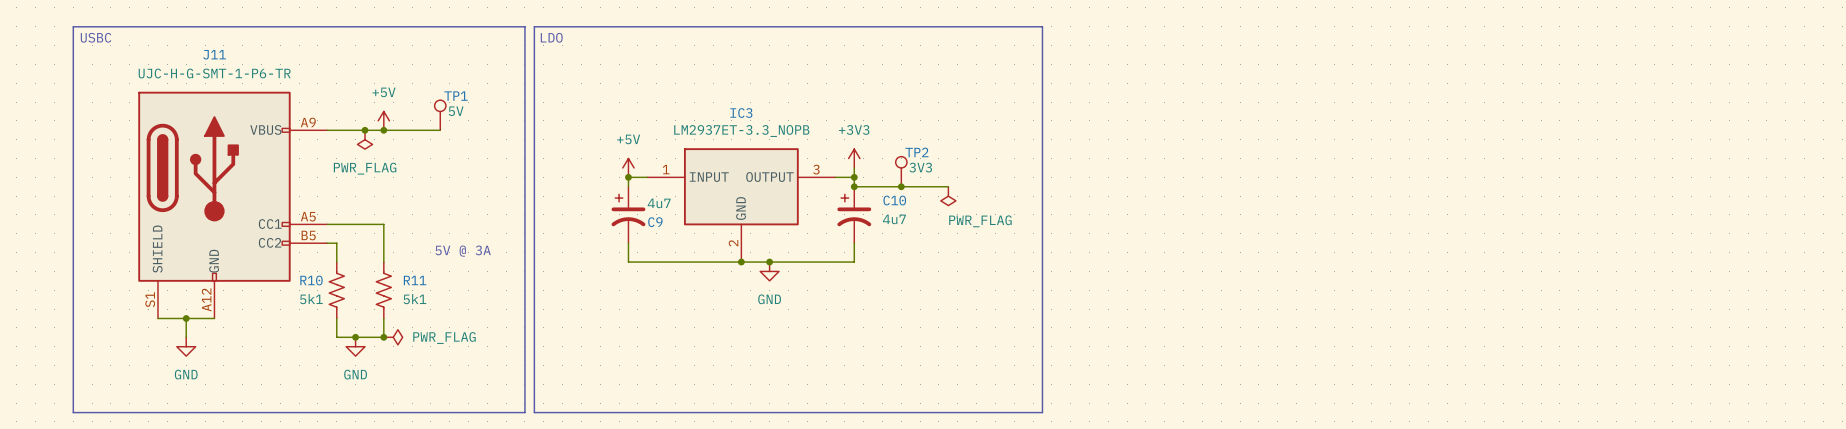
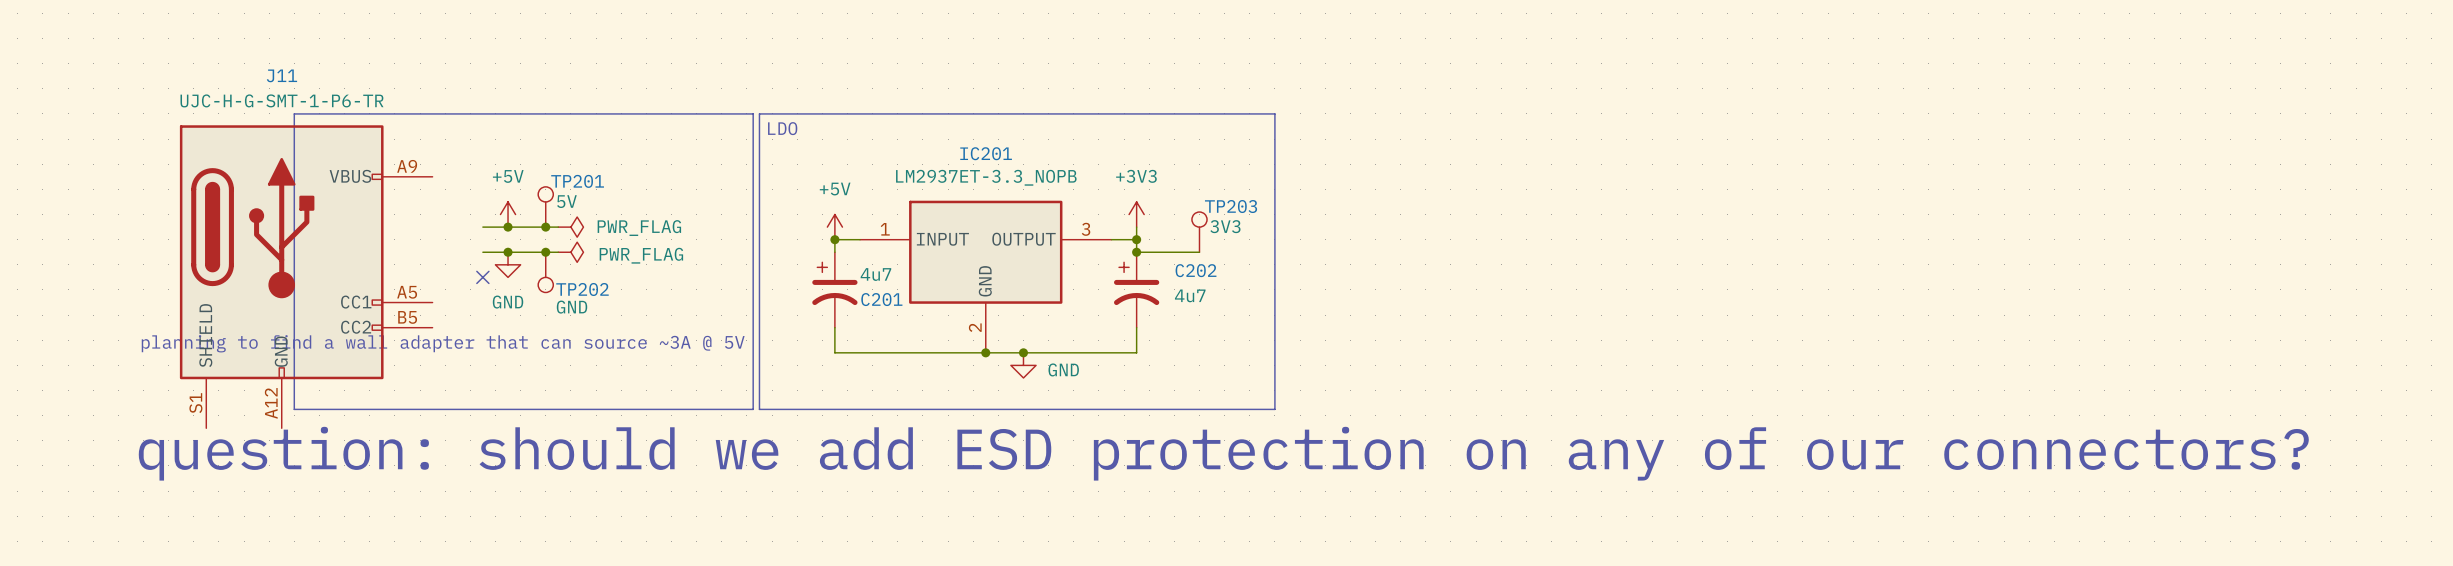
line: (73, 26) (524, 26) (524, 412) (73, 412) (73, 26) -> none
line: (534, 26) (1042, 26) (1042, 412) (534, 412) (534, 26) -> none
text: USBC (96, 37) -> none
text position: LDO (551, 37) -> LDO (782, 128)
line: none -> (294, 113) (753, 113) (753, 409) (294, 409) (294, 113)
line: none -> (759, 113) (1274, 113) (1274, 409) (759, 409) (759, 113)
IC3 name: IC3 (741, 113) -> IC201 (986, 153)
TP1: 5V (440, 115) -> none
power symbol position: +5V (383, 120) -> +5V (508, 214)
wire: (327, 130) (440, 130) -> none
junction: (365, 130) -> none
junction: (383, 130) -> none
power symbol: PWR_FLAG (365, 139) -> none
TP201: none -> 5V (545, 206)
TP2 name: TP2 (916, 152) -> TP203 (1231, 206)
wire: none -> (482, 227) (558, 227)
junction: none -> (508, 227)
junction: none -> (545, 227)
power symbol: none -> PWR_FLAG (570, 227)
wire: none -> (482, 252) (558, 252)
junction: none -> (508, 252)
junction: none -> (545, 252)
power symbol: none -> PWR_FLAG (570, 252)
wire: (901, 186) (948, 186) -> none
junction: (901, 186) -> none
power symbol: none -> GND (508, 264)
power symbol: PWR_FLAG (948, 196) -> none
C10 name: C10 (894, 200) -> C202 (1196, 270)
TP202: none -> GND (545, 272)
no-connect mark: none -> (482, 277)
C9 name: C9 (655, 222) -> C201 (881, 299)
wire: (327, 224) (383, 224) (383, 262) -> none
wire: (327, 243) (336, 243) (336, 262) -> none
text: 5V @ 3A (463, 251) -> none
text: none -> planning to find a wall adapter that can source ~3A @ 5V (443, 343)
R10: 5k1 (336, 290) -> none
R11: 5k1 (383, 290) -> none
power symbol text position: GND (769, 299) -> GND (1063, 369)
wire: (157, 318) (214, 318) -> none
wire: (186, 318) (186, 337) -> none
junction: (186, 318) -> none
wire: (336, 318) (336, 337) (383, 337) (383, 318) -> none
junction: (355, 337) -> none
junction: (383, 337) -> none
power symbol: PWR_FLAG (393, 337) -> none
text: none -> question: should we add ESD protection on any of our connectors? (1223, 453)
power symbol: GND (186, 346) -> none
power symbol: GND (355, 346) -> none

